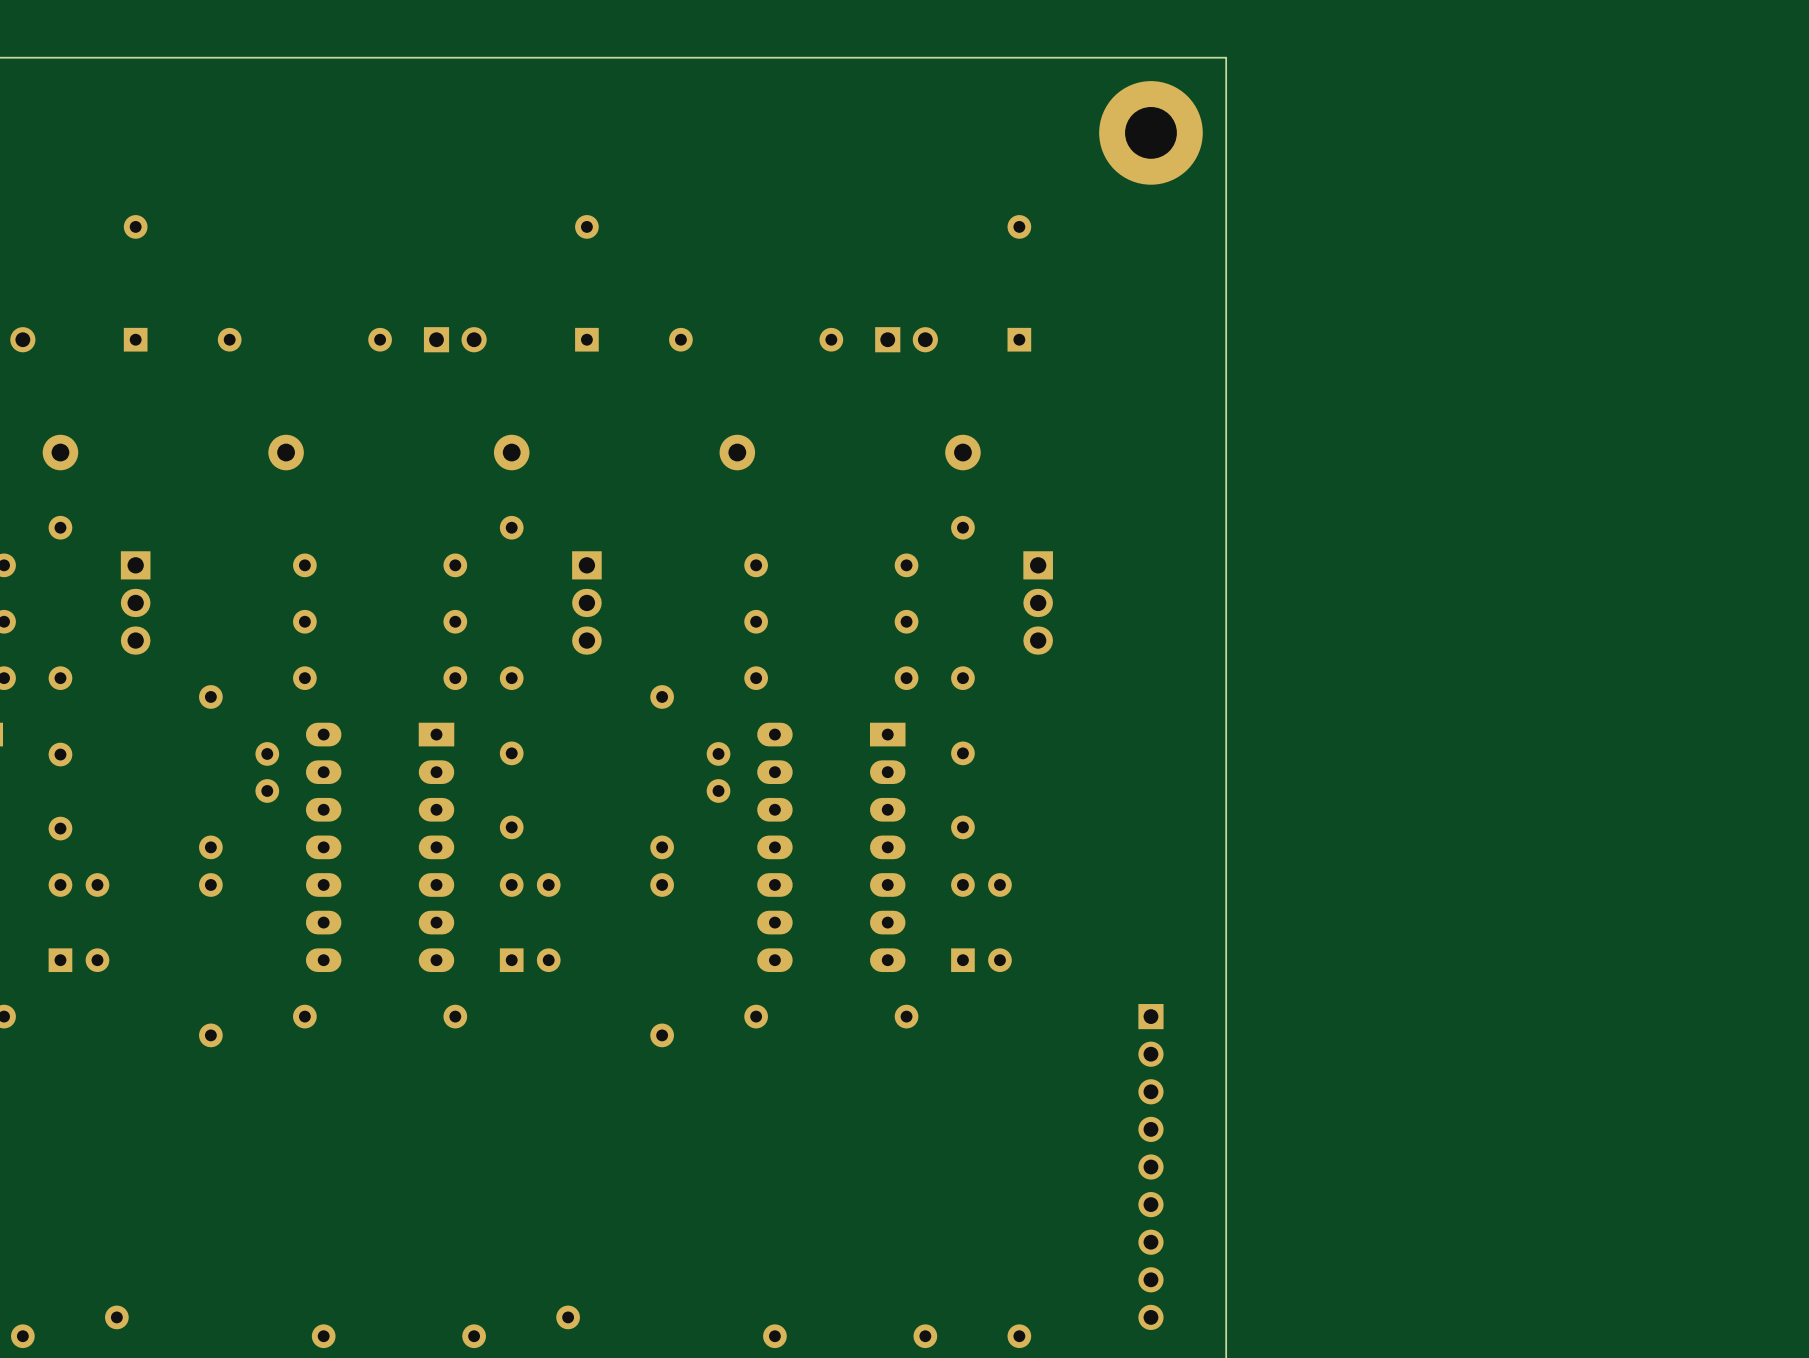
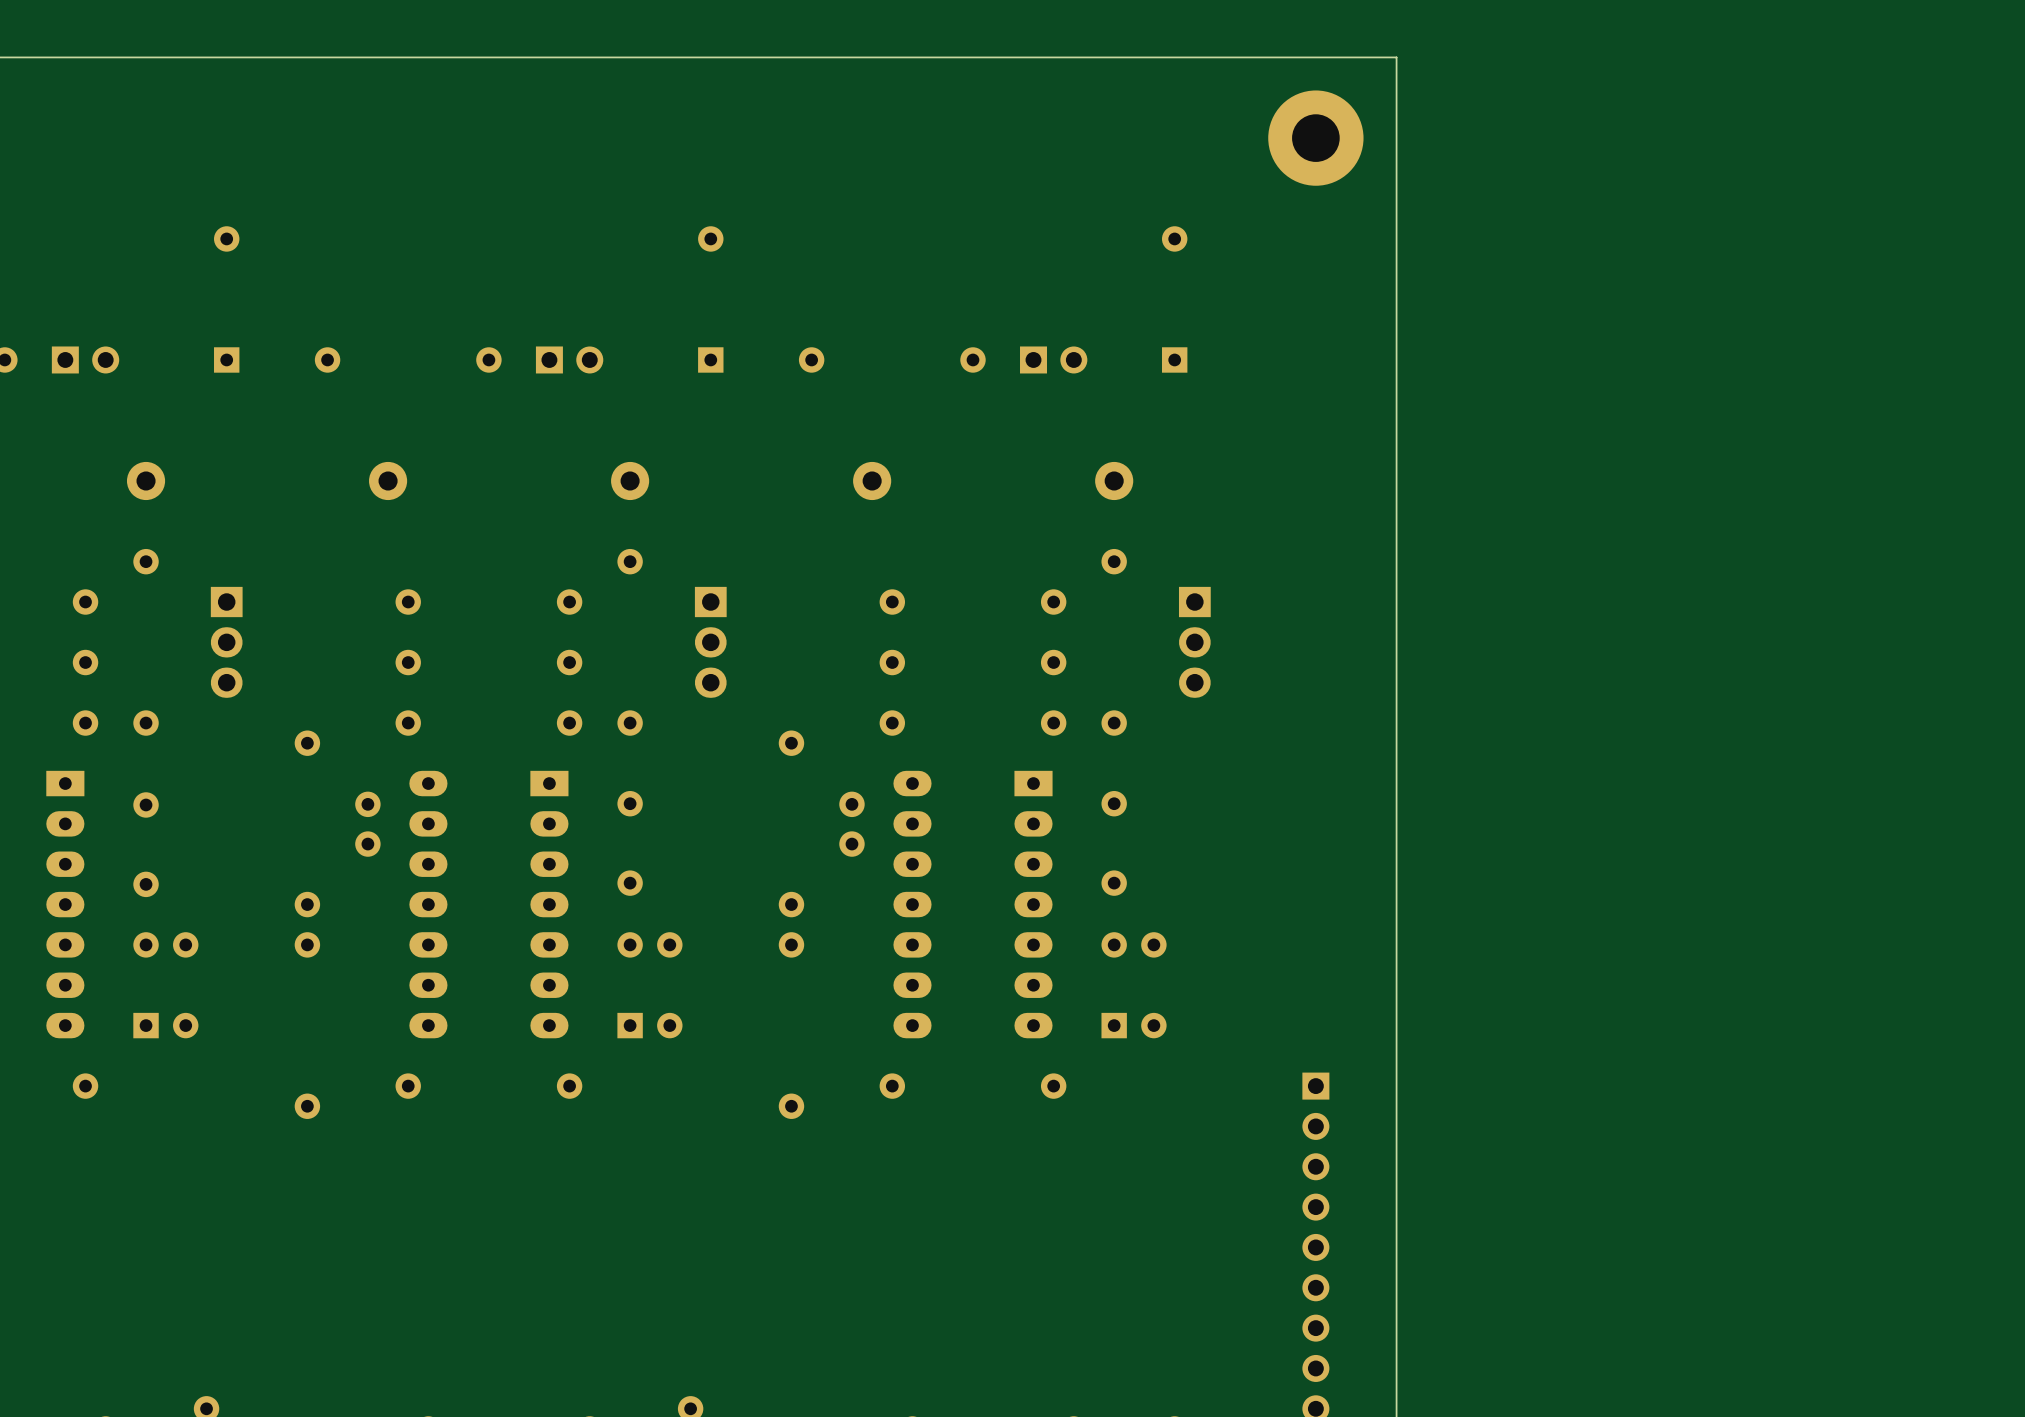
part footprint: [1099, 81, 1203, 185] -> [1268, 90, 1364, 186]

